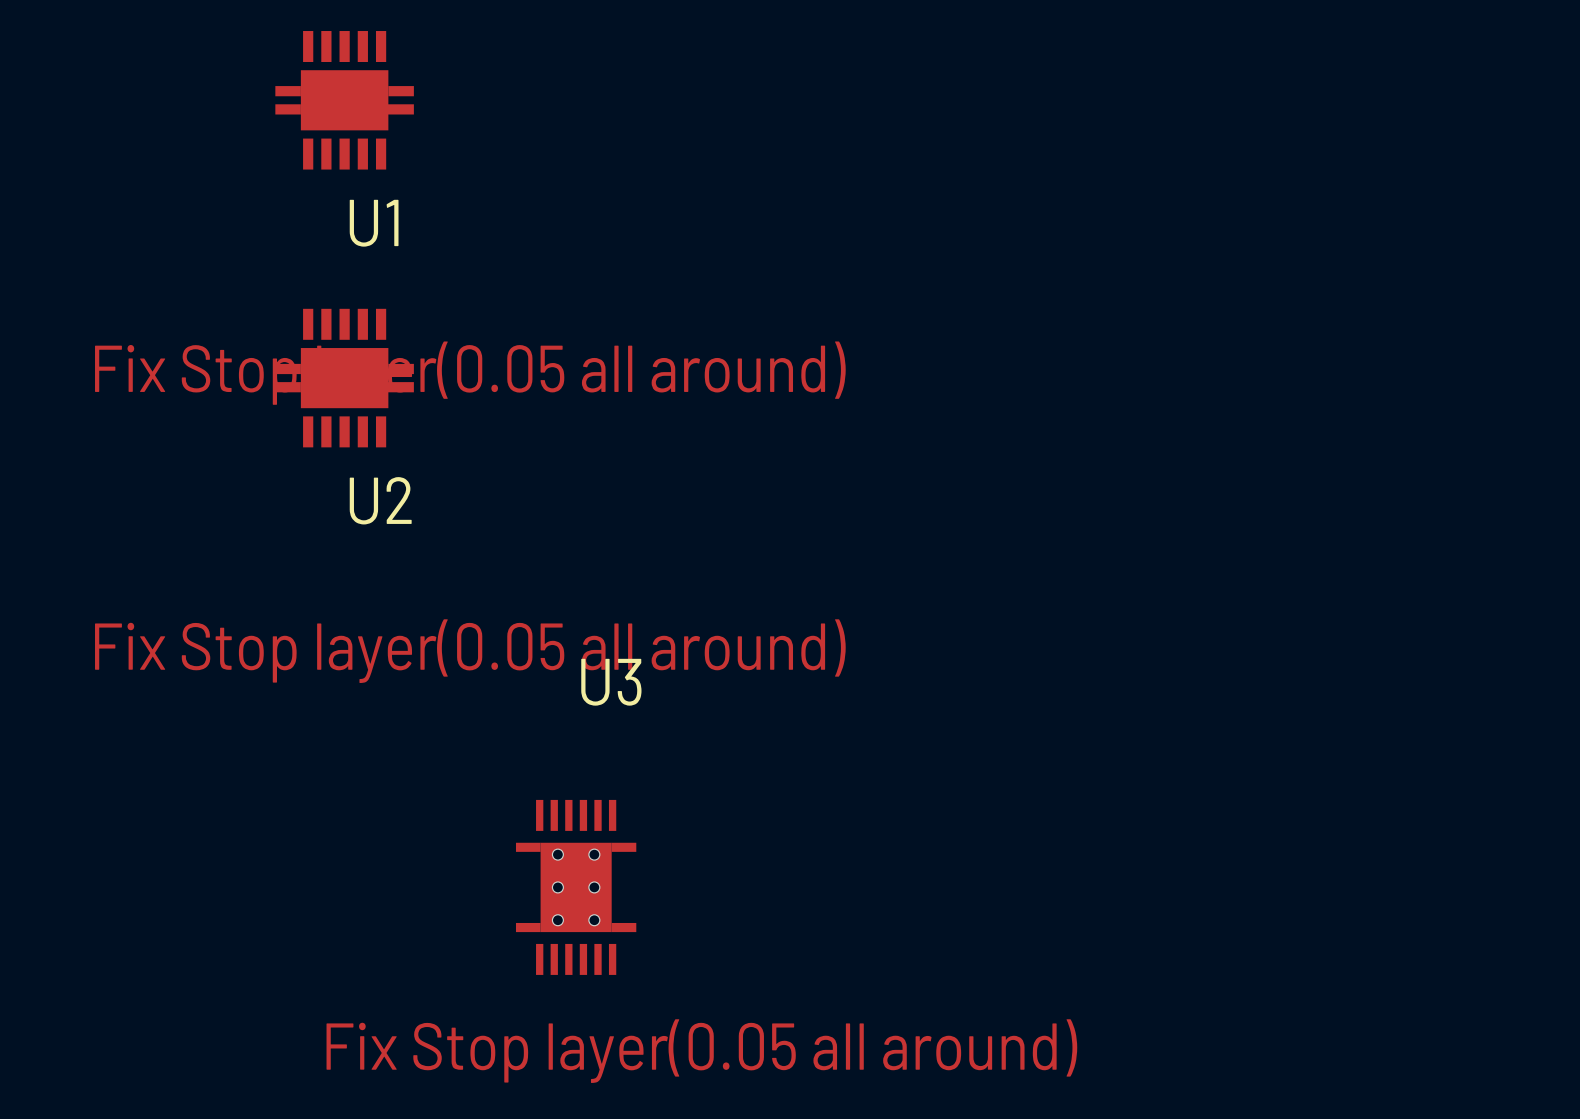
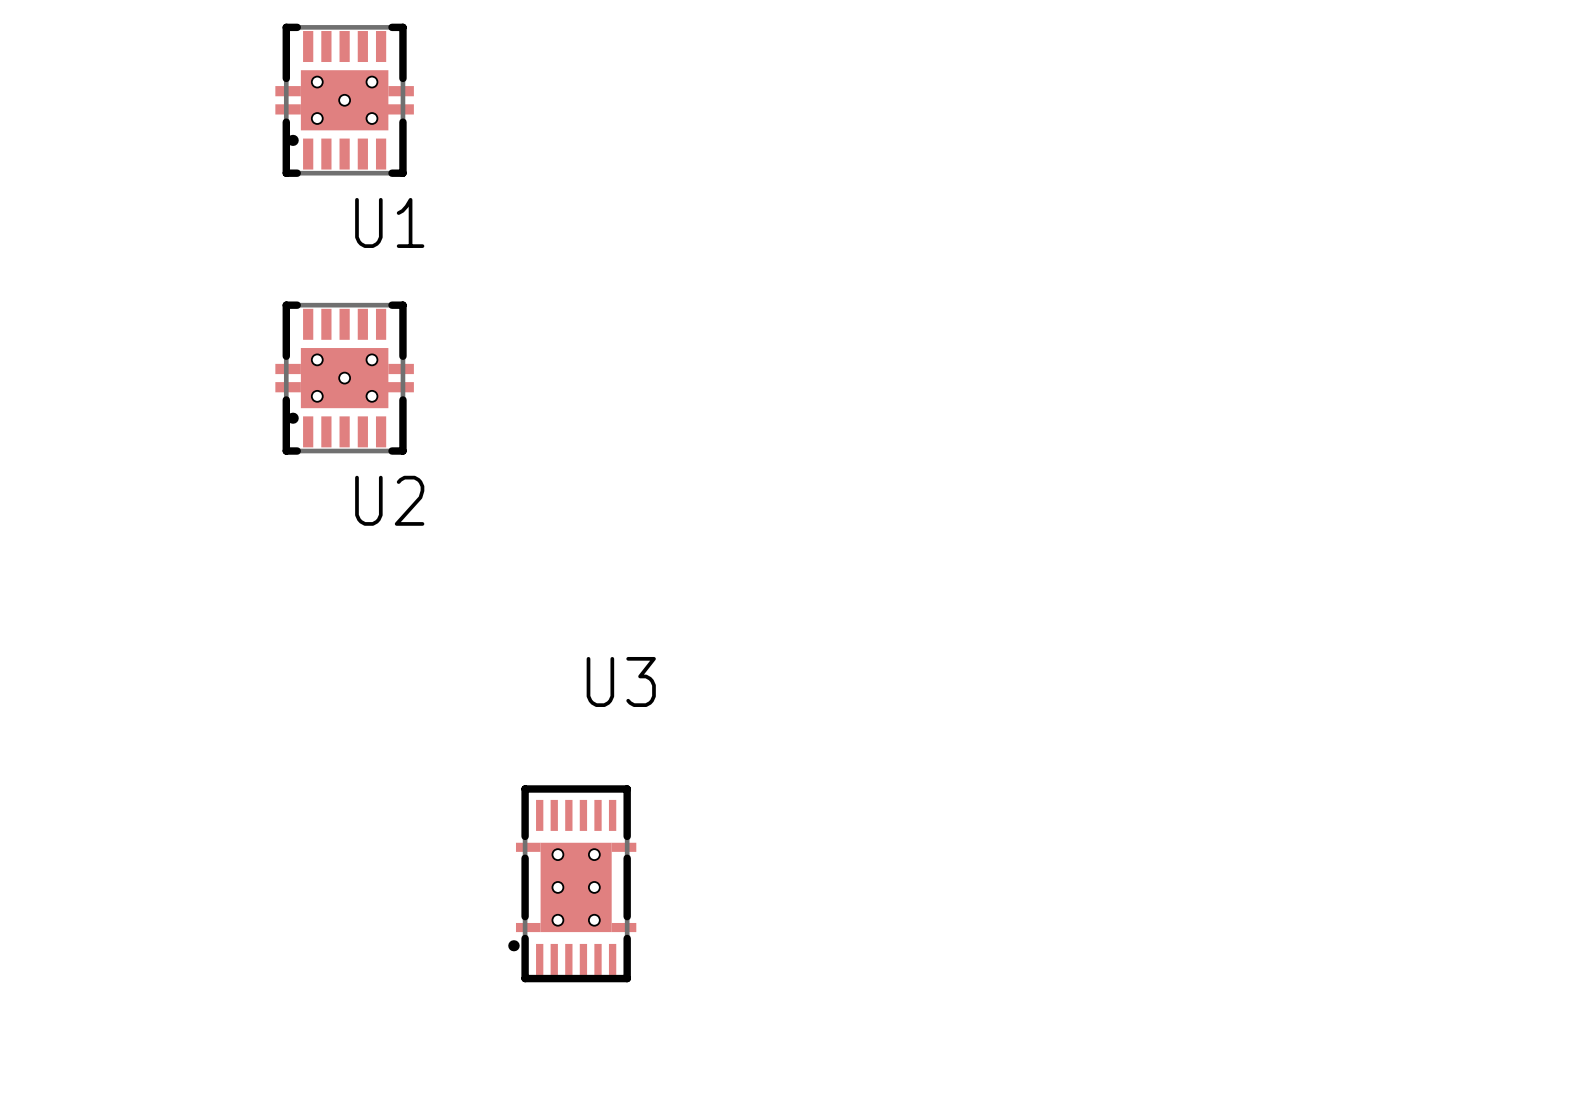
U1 footprint: [275, 31, 414, 170] -> [275, 23, 414, 177]
U2 footprint: [275, 308, 414, 448] -> [275, 301, 414, 455]
U3 footprint: [515, 799, 637, 975] -> [508, 785, 637, 983]

